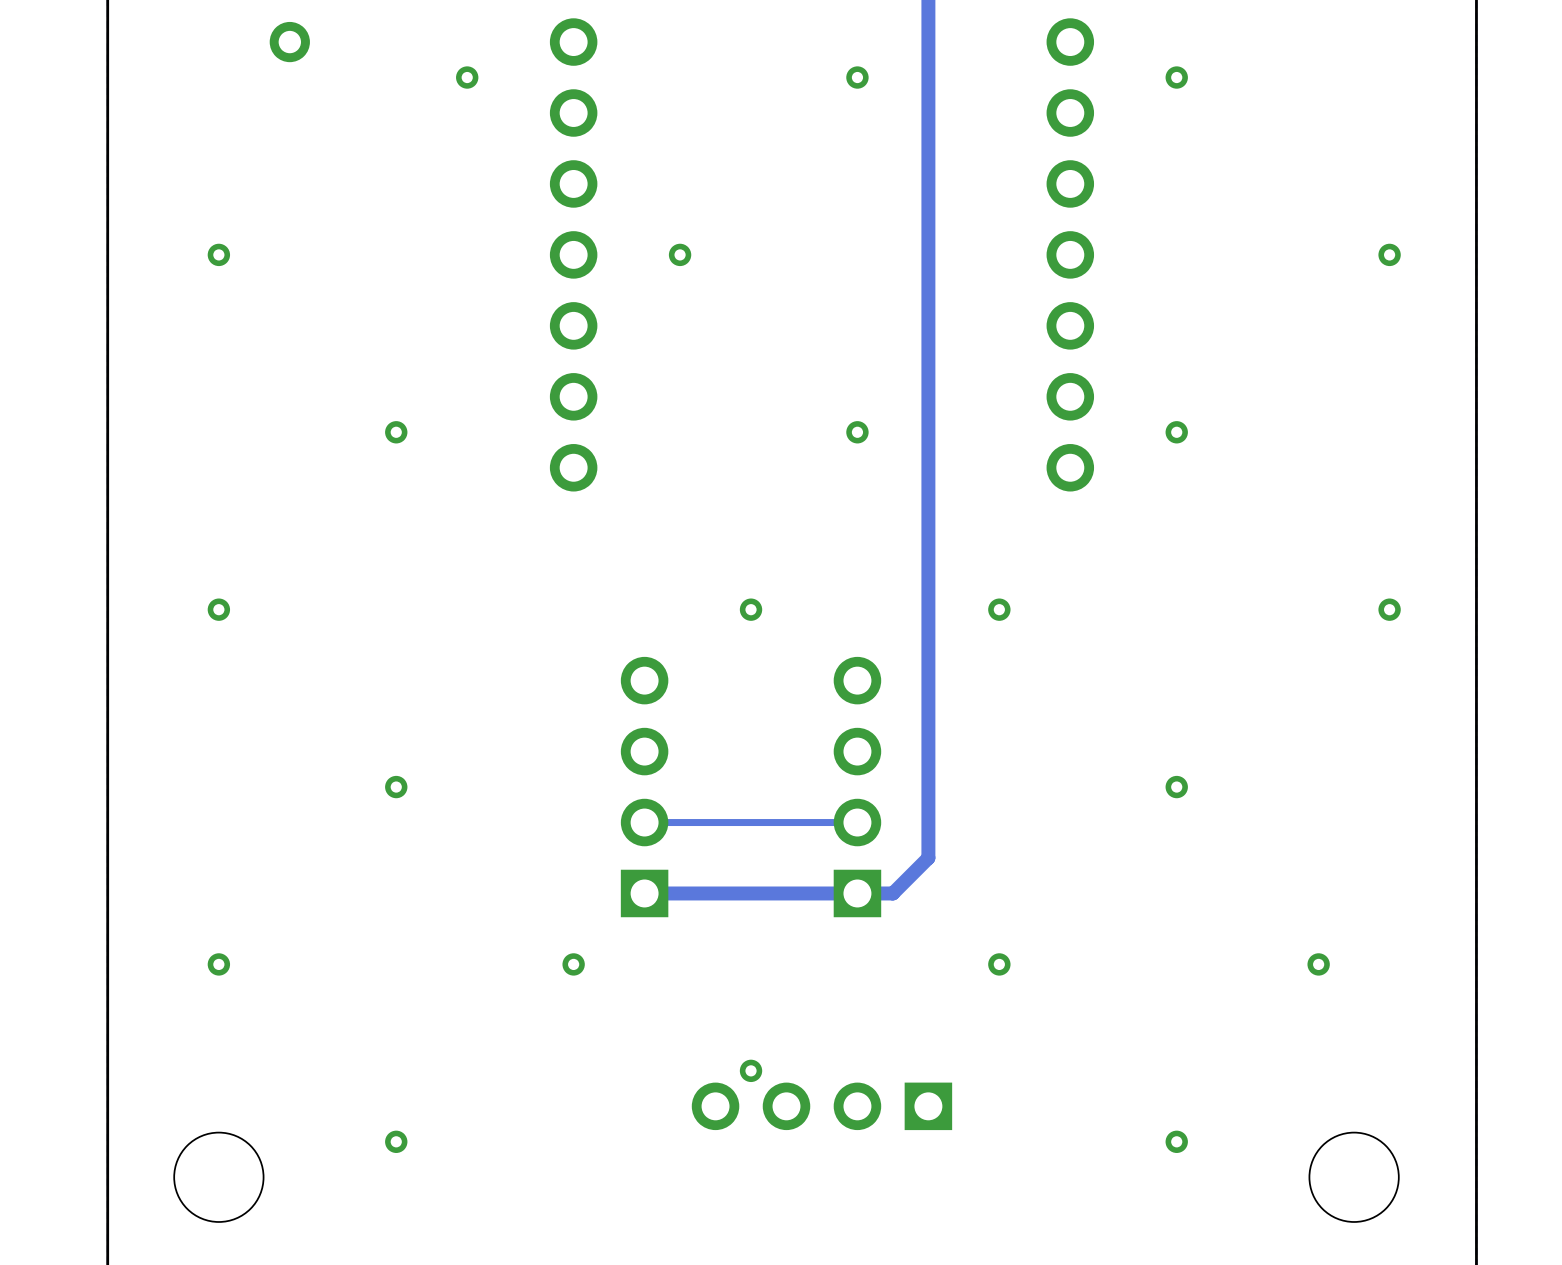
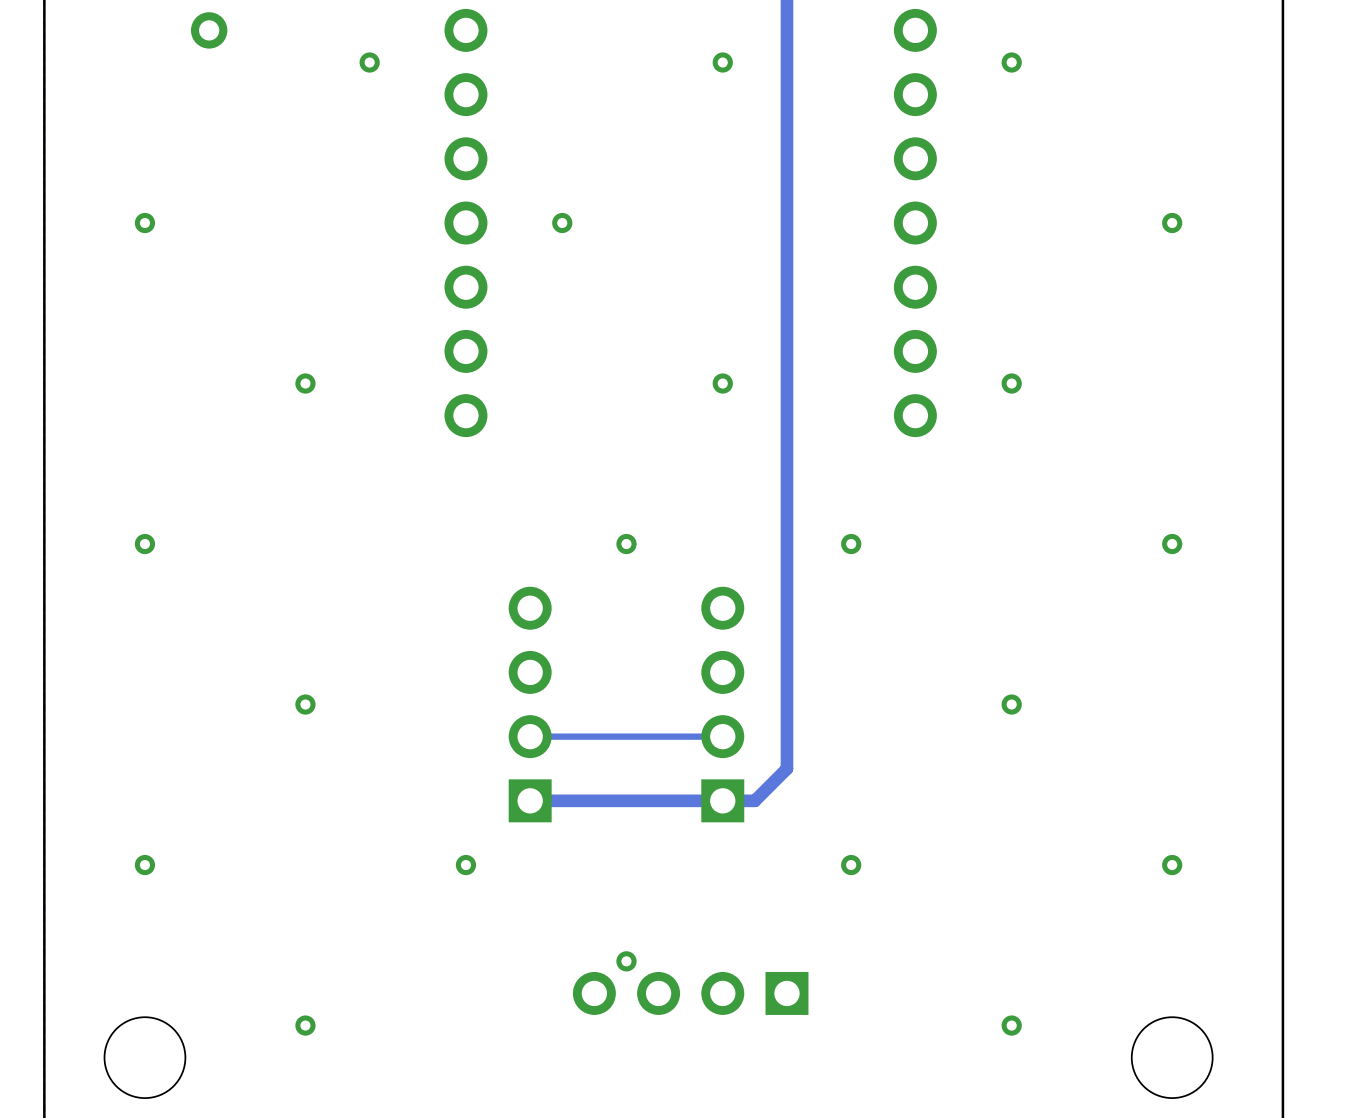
via position: (1389, 254) -> (1172, 223)
via position: (1389, 609) -> (1172, 544)
via position: (1318, 964) -> (1172, 865)

